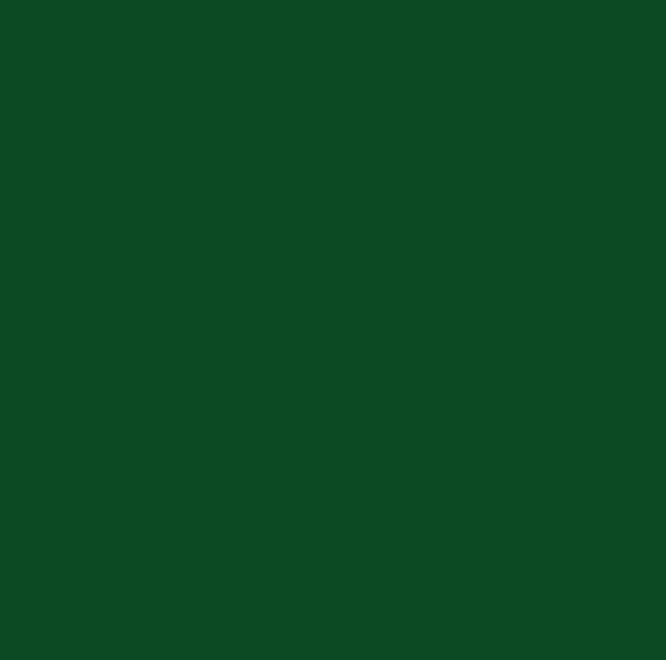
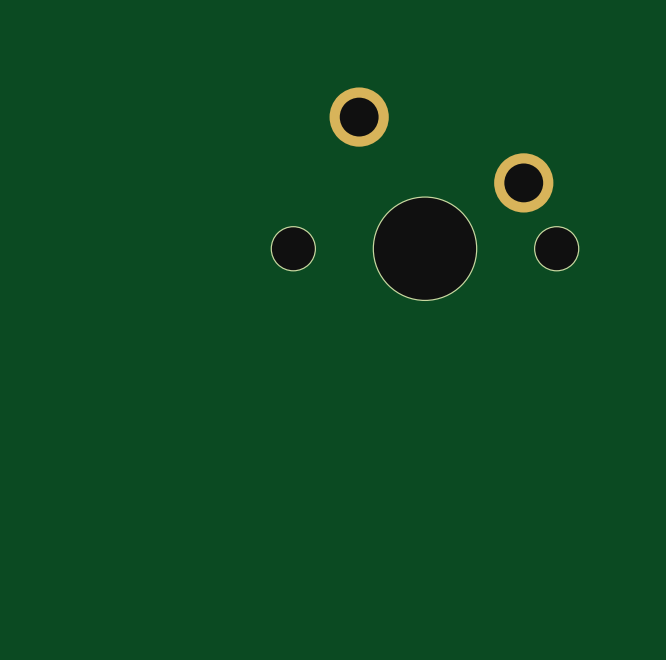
part: none -> (425, 193)

